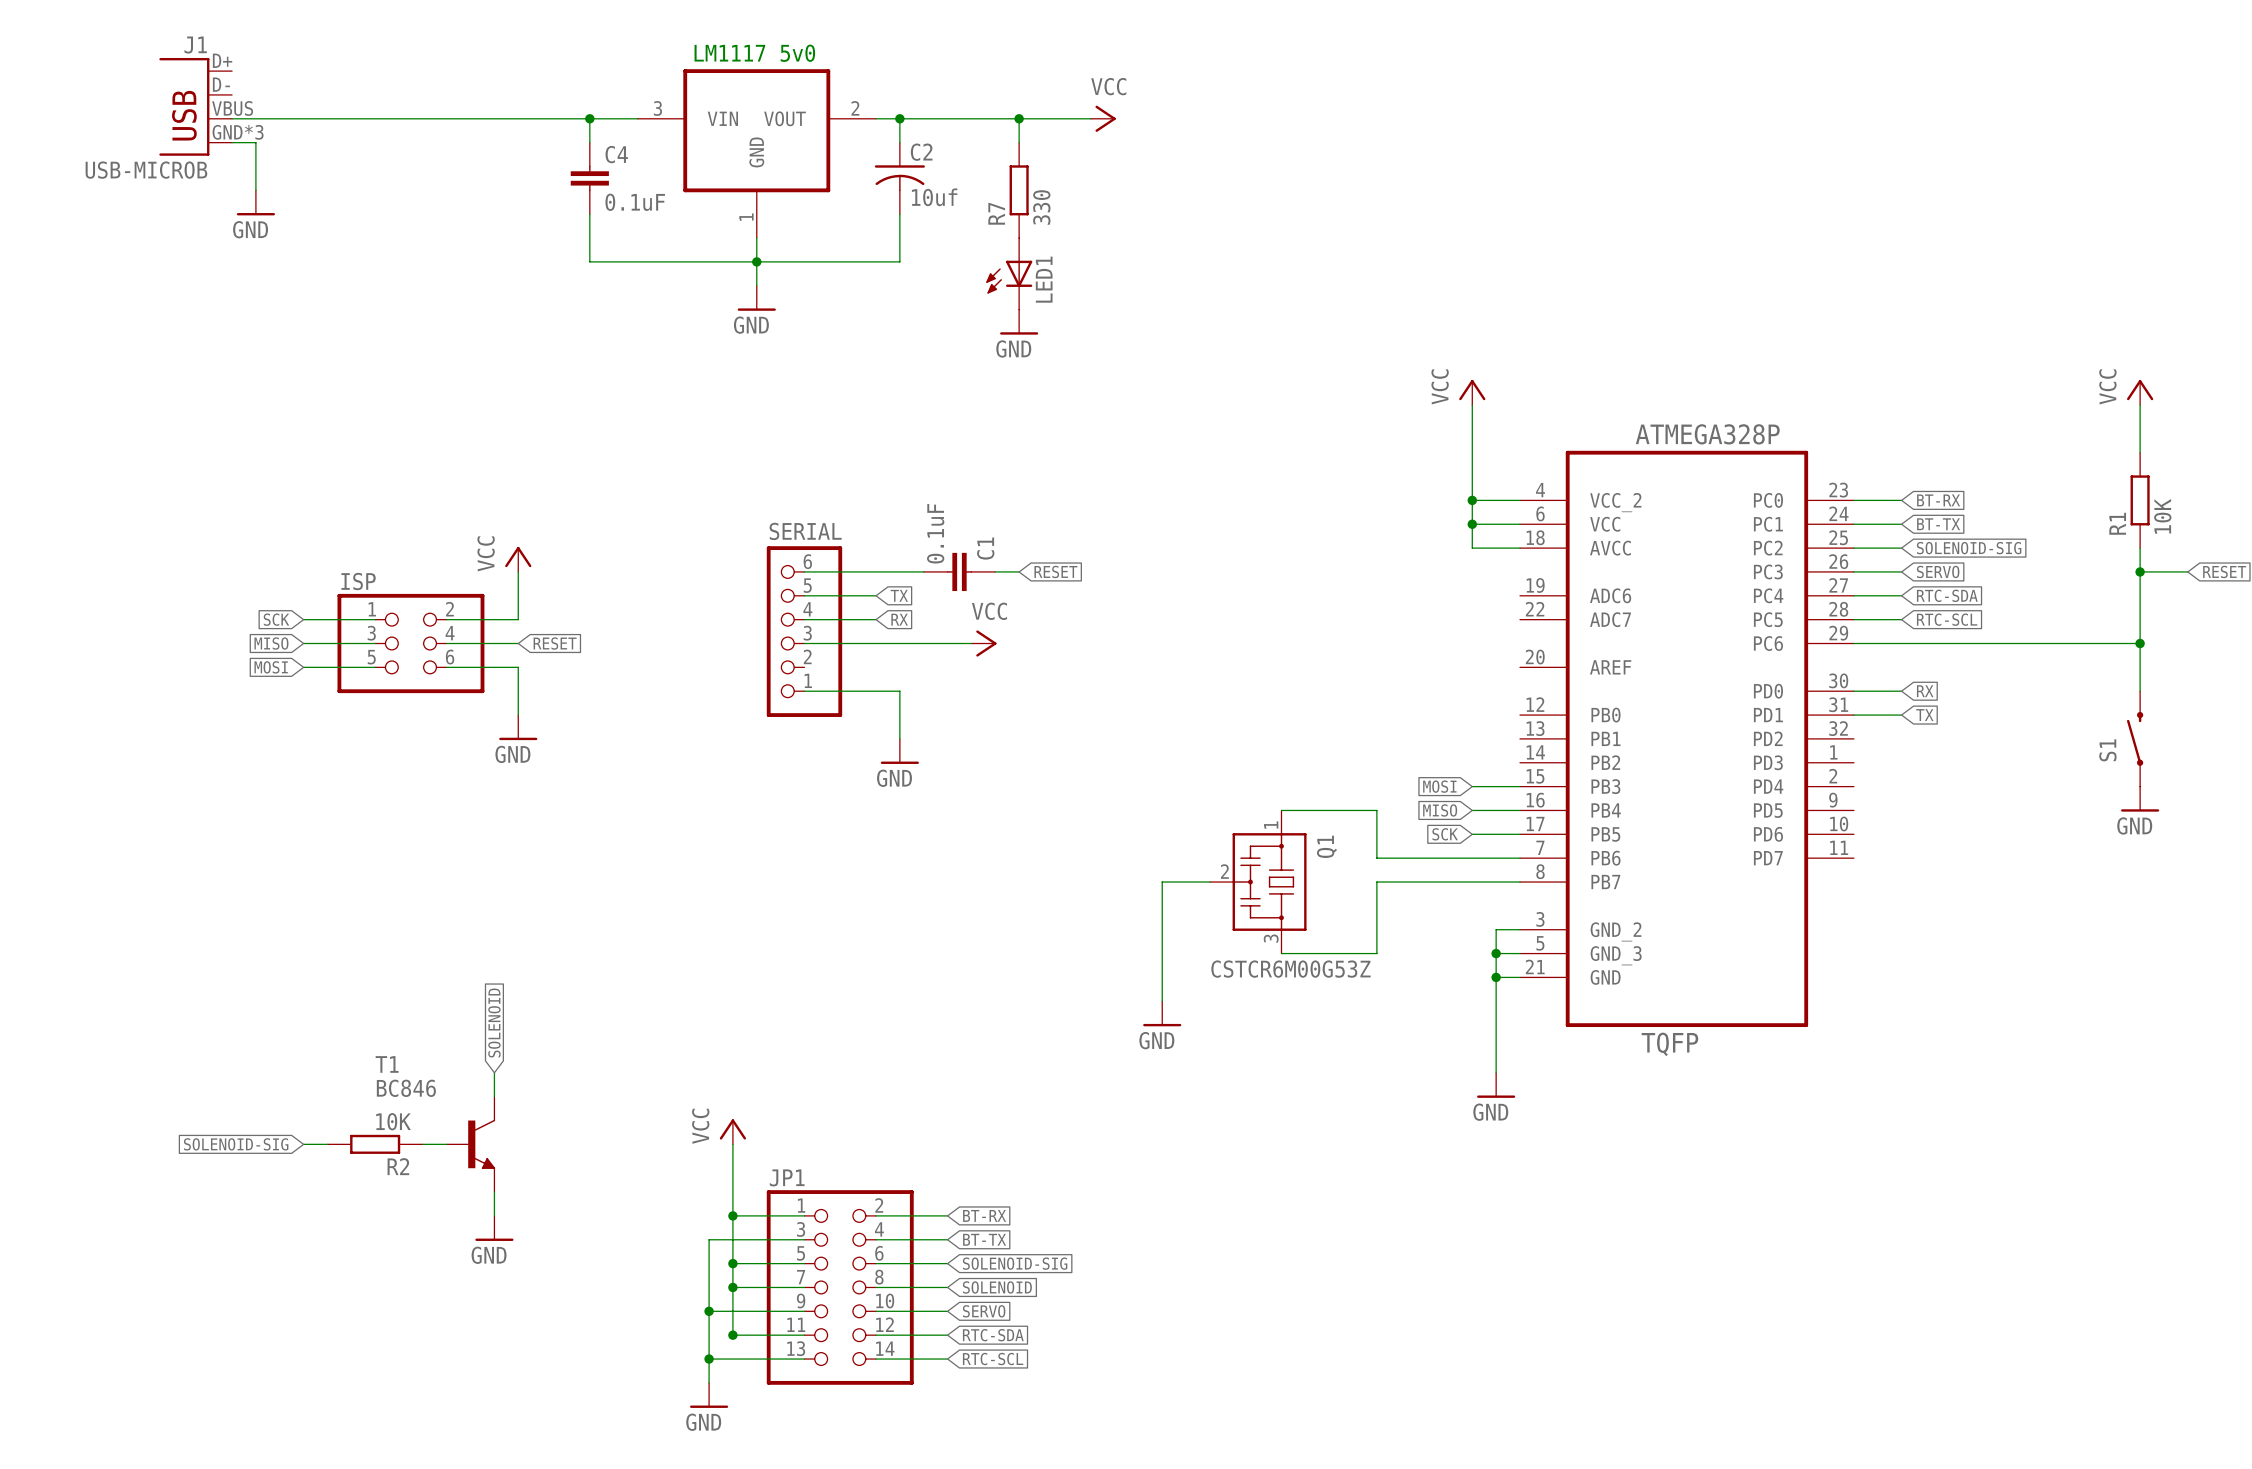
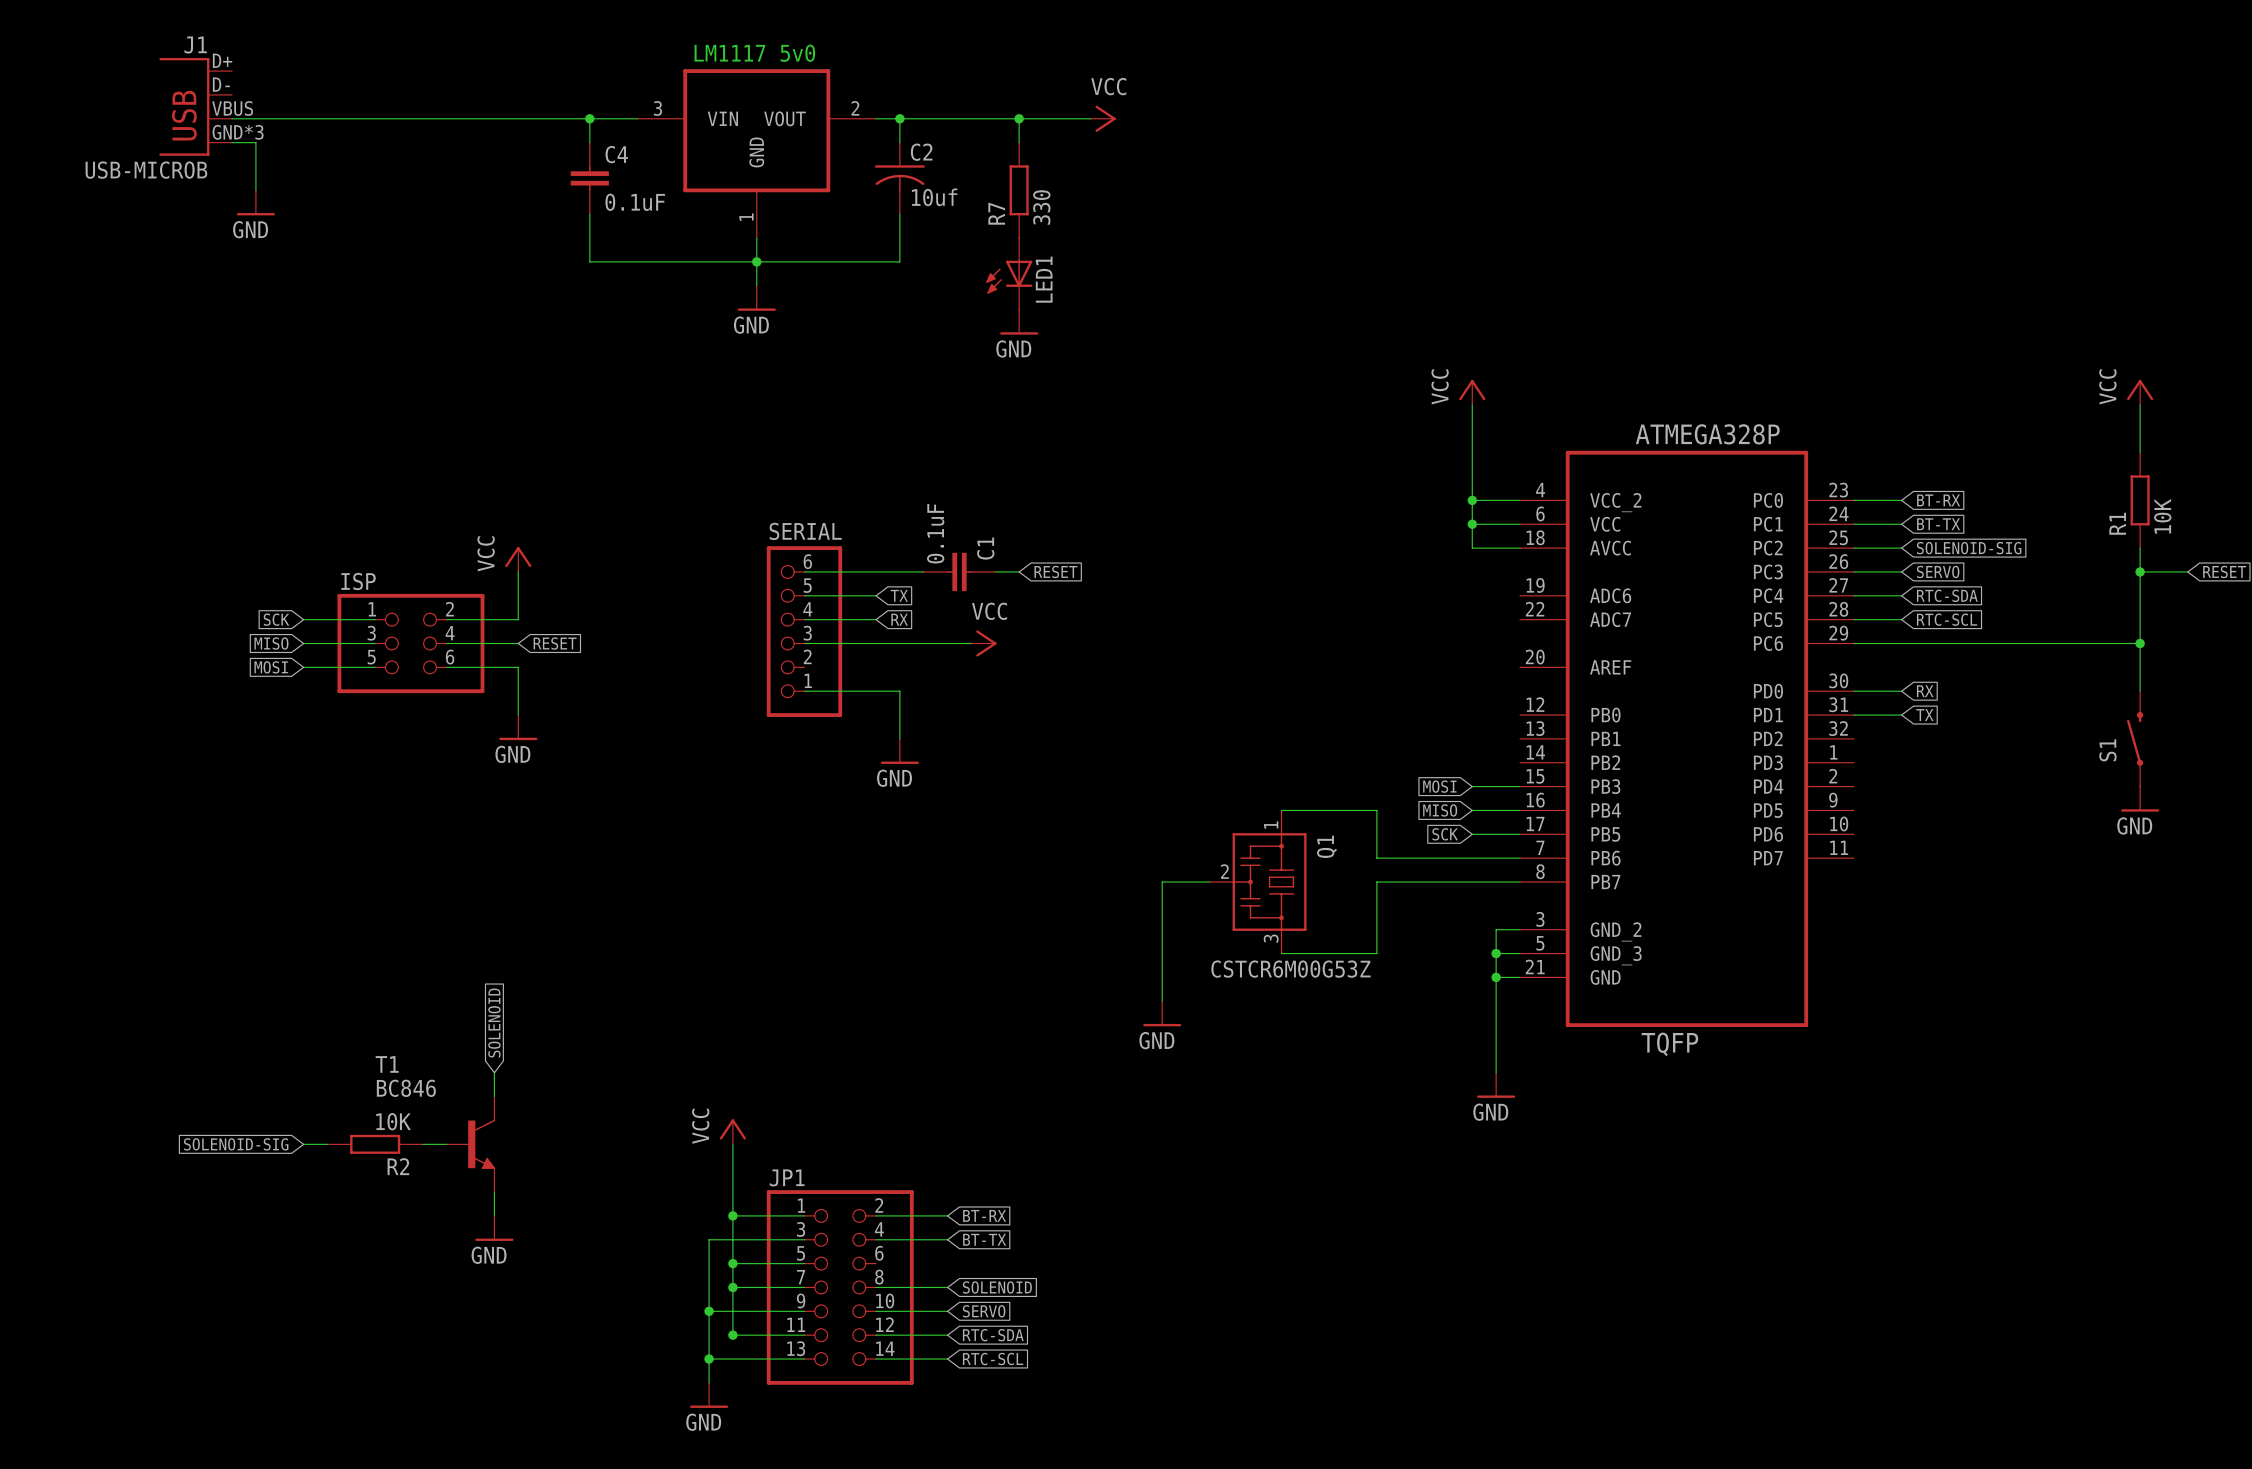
wire: (876, 1263) (947, 1263) -> none
global label: SOLENOID-SIG (1015, 1263) -> none

